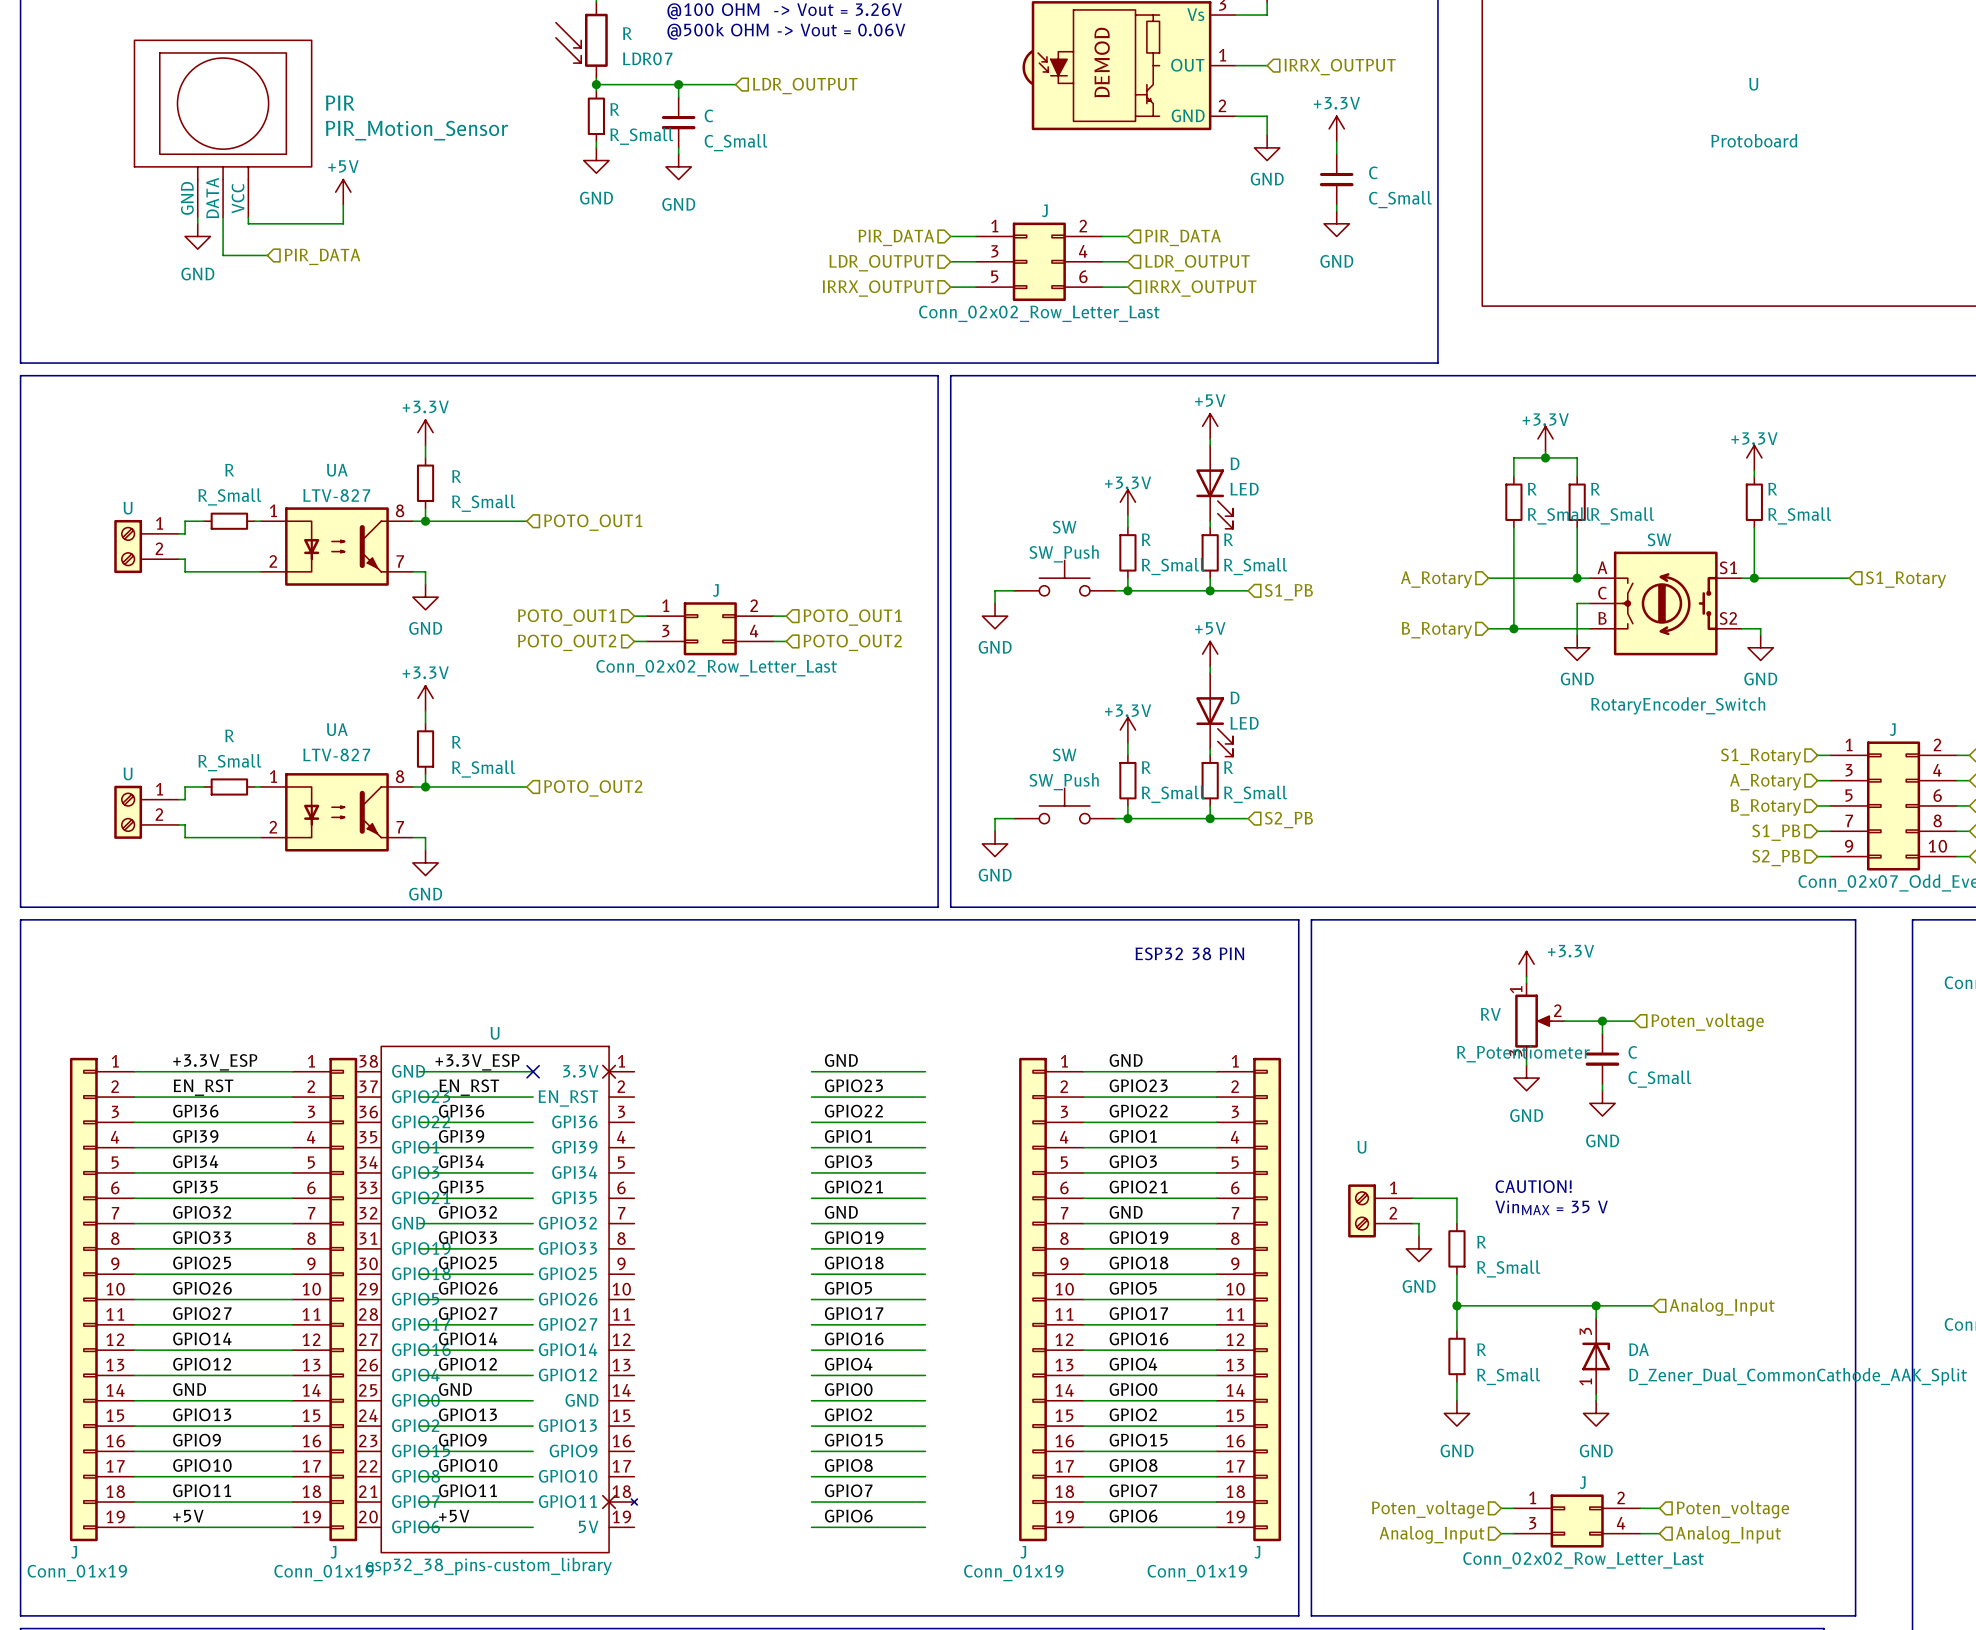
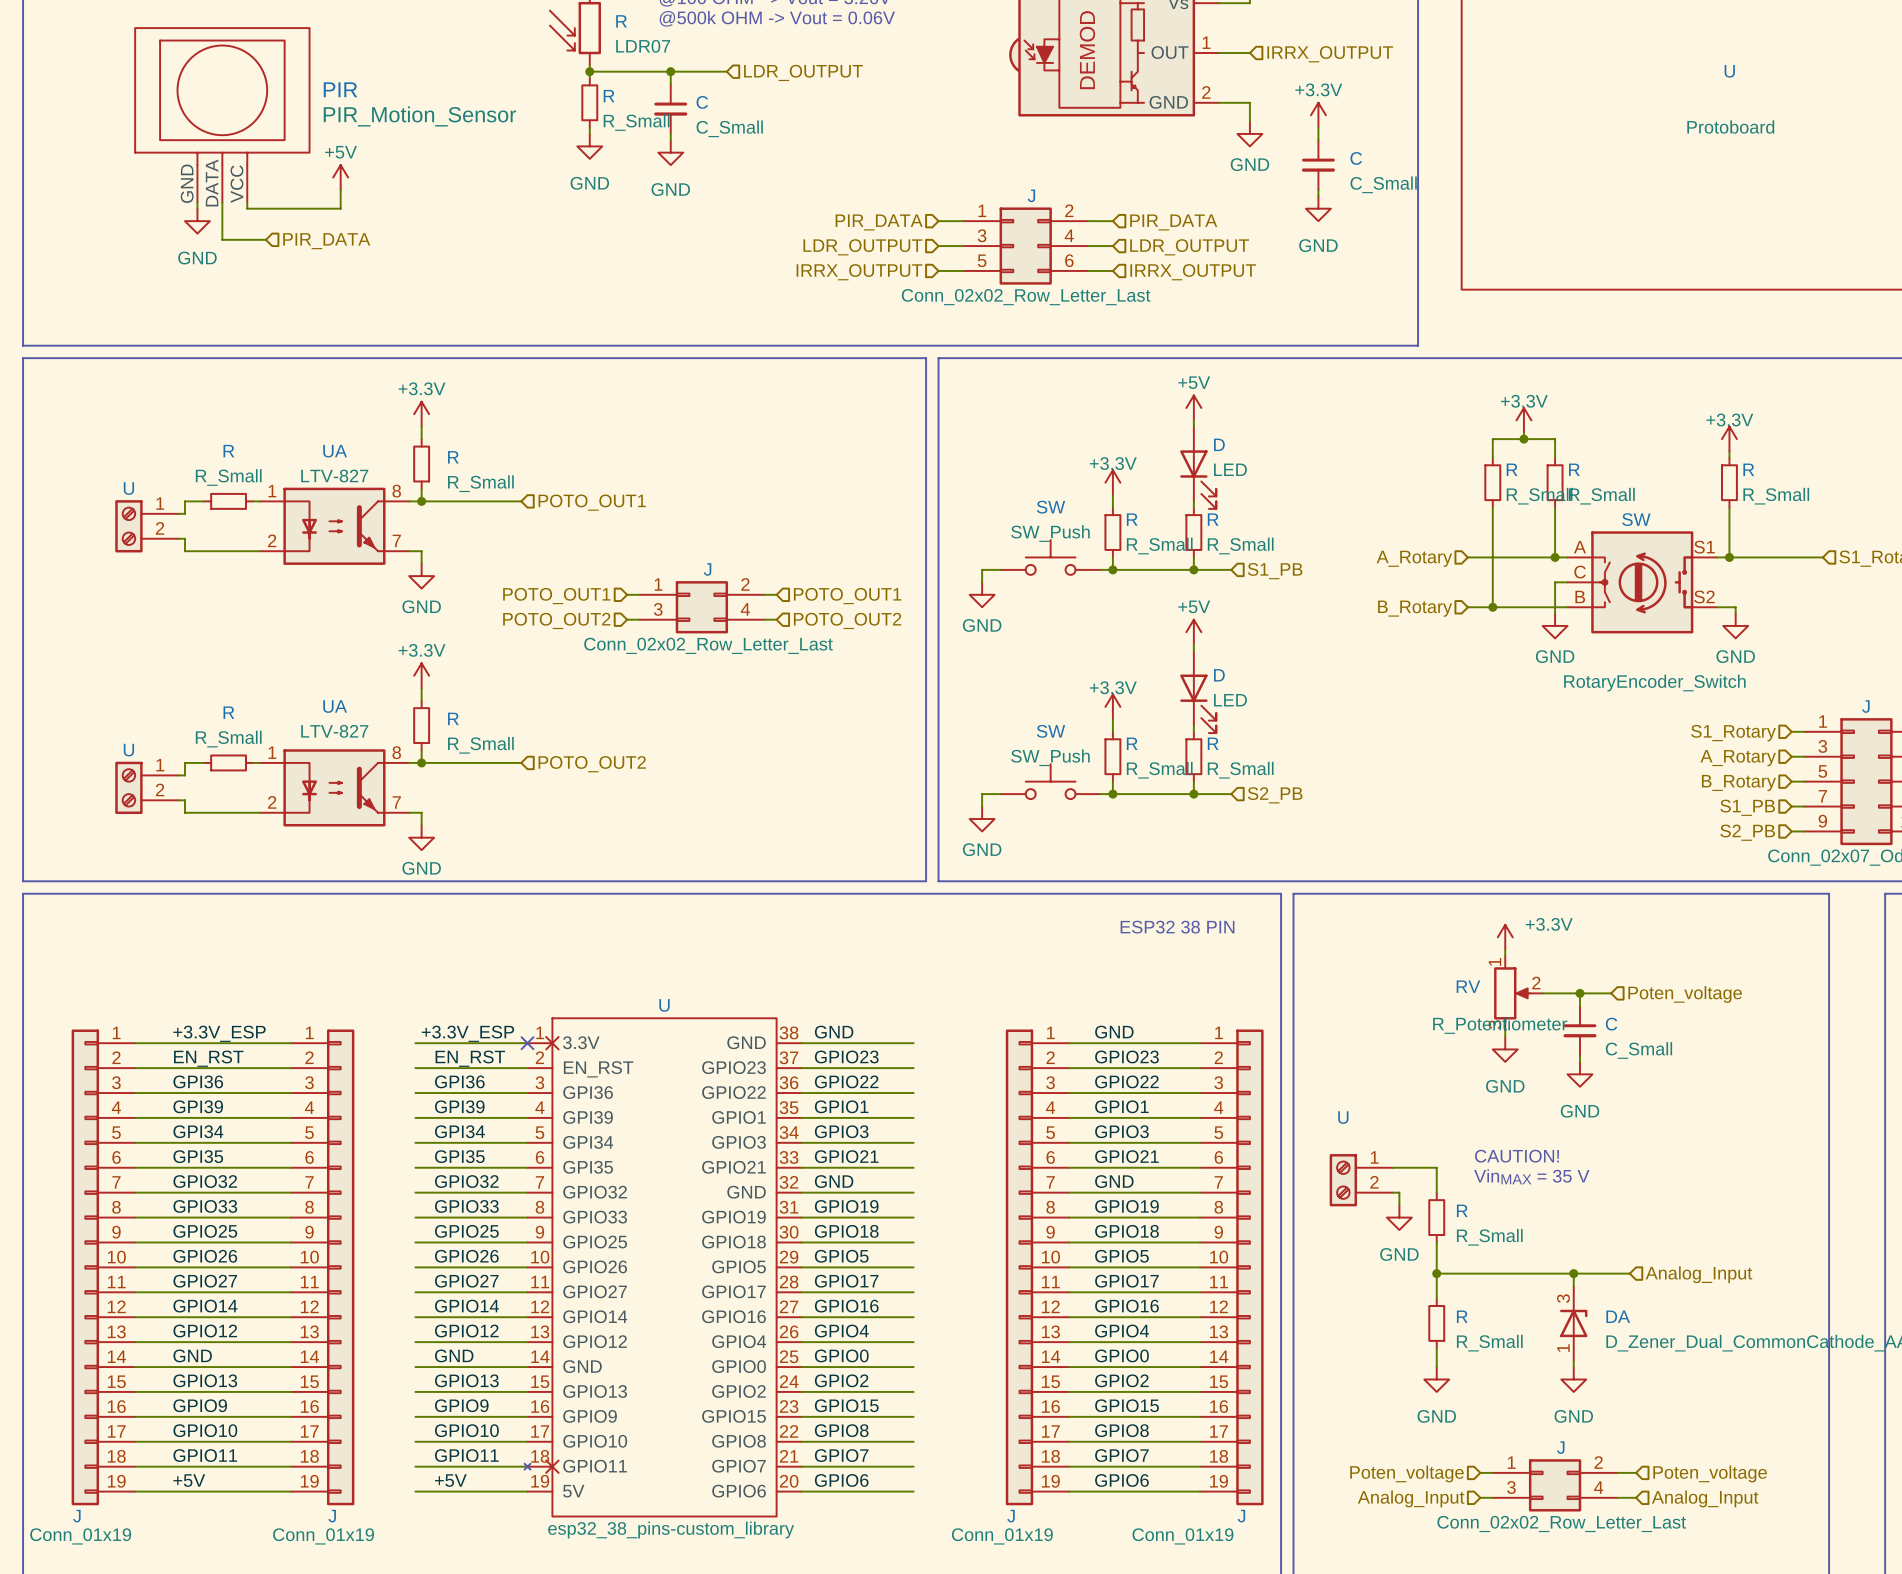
U: esp32_38_pins-custom_library (496, 1299) -> none
U: none -> esp32_38_pins-custom_library (663, 1267)

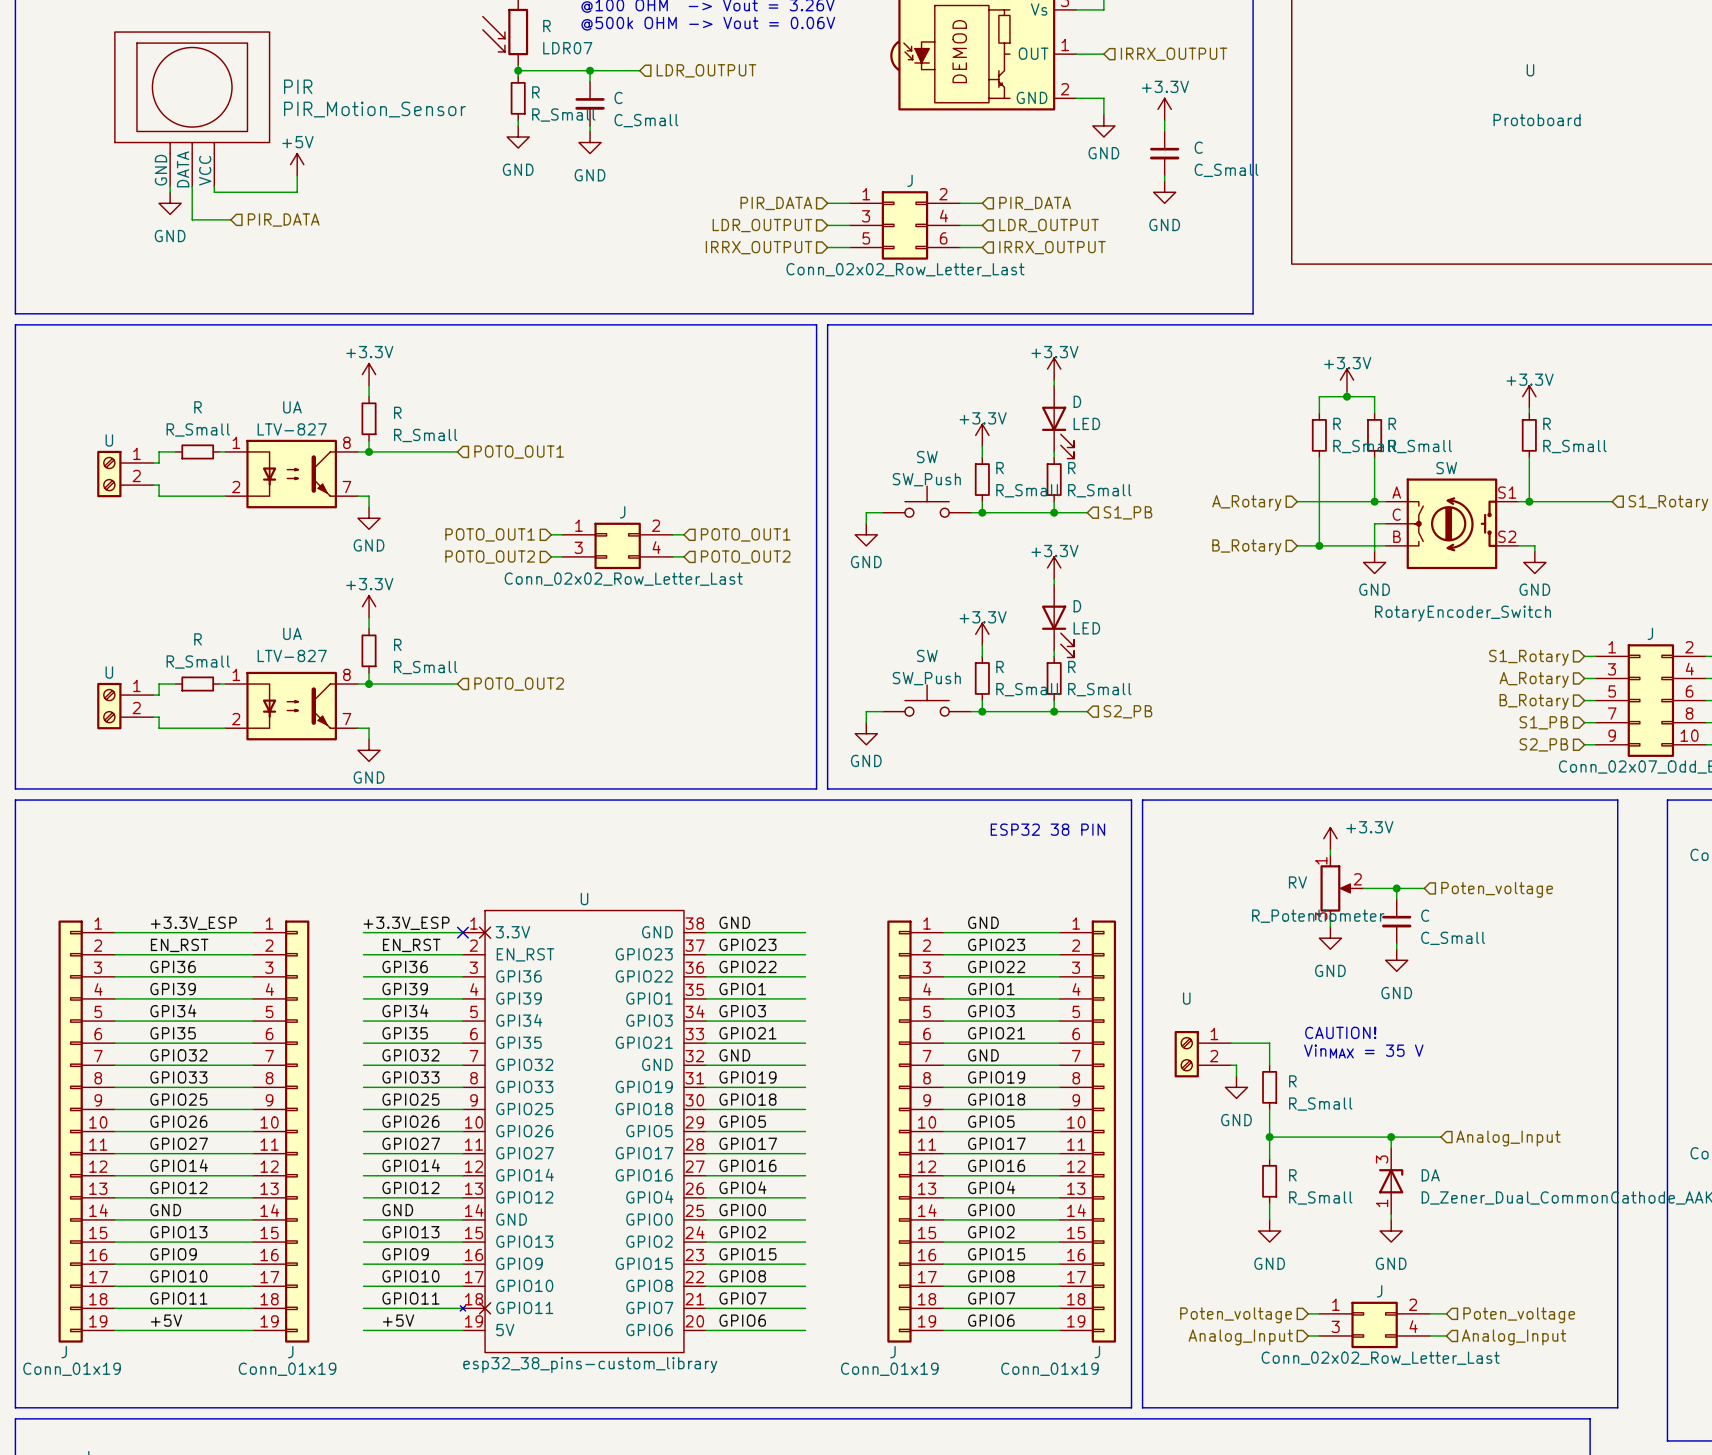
power symbol: +5V (1193, 407) -> +3.3V (1054, 369)
power symbol: +5V (1193, 632) -> +3.3V (1054, 567)

